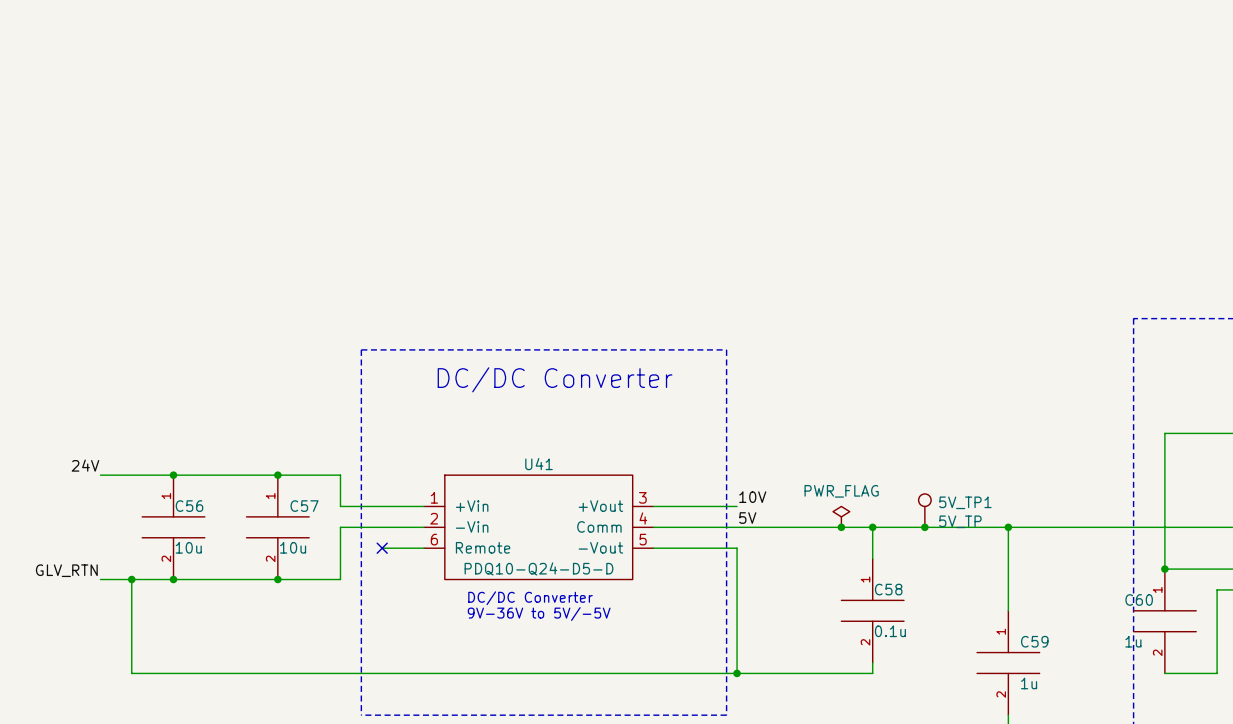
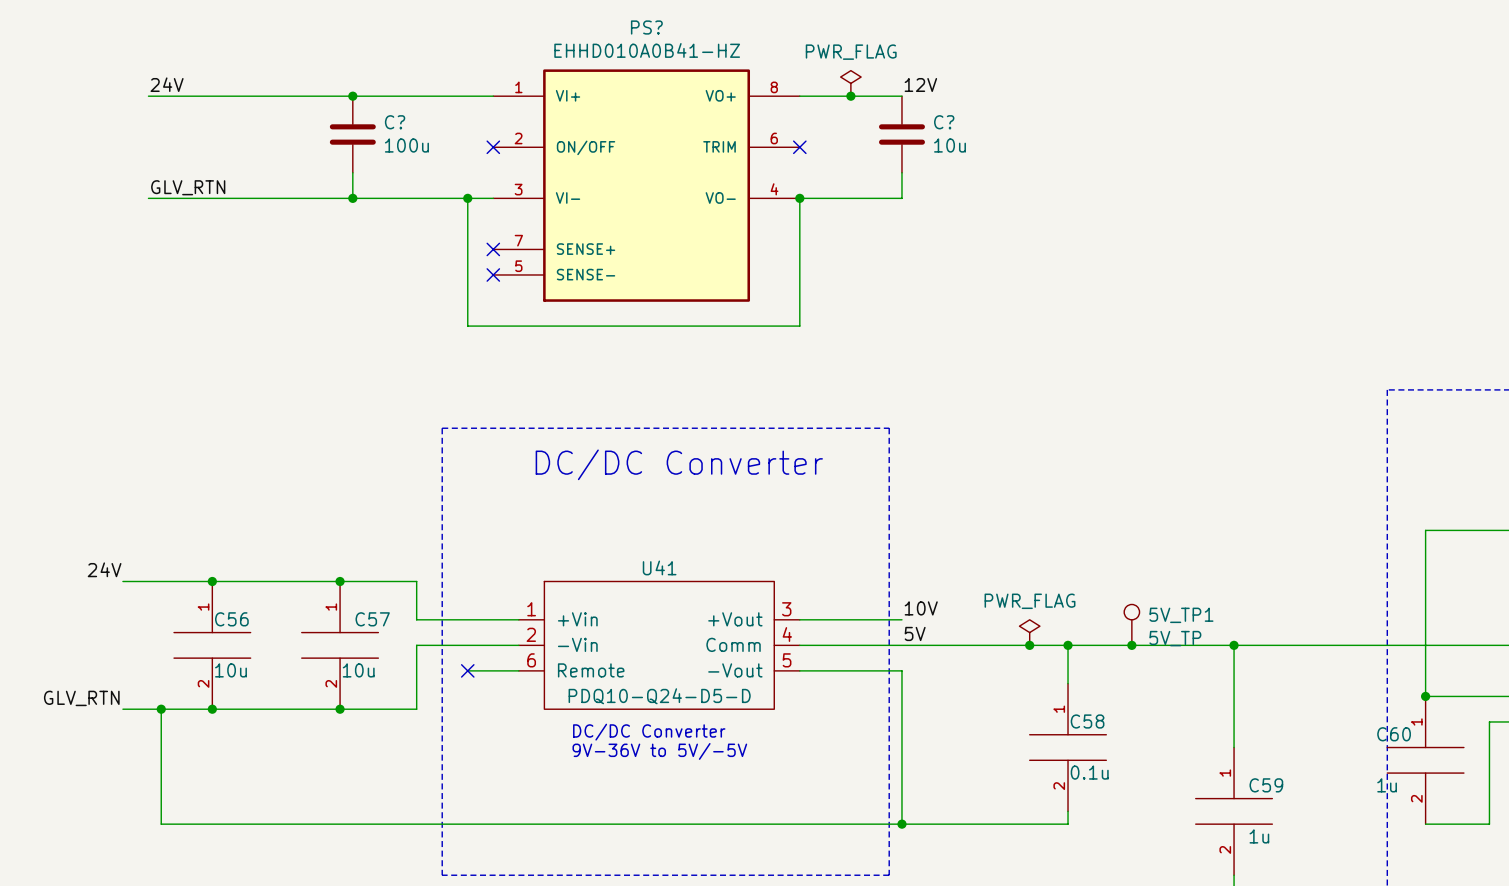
power symbol: none -> PWR_FLAG (850, 83)
label: none -> 24V (167, 84)
label: none -> 12V (920, 84)
wire: none -> (148, 96) (493, 96)
junction: none -> (352, 96)
wire: none -> (799, 96) (901, 96)
junction: none -> (850, 96)
C?: none -> 100u (352, 134)
C?: none -> 10u (901, 134)
no-connect mark: none -> (493, 147)
no-connect mark: none -> (799, 147)
wire: none -> (352, 172) (352, 198)
wire: none -> (901, 172) (901, 198) (799, 198) (799, 326) (467, 326) (467, 198)
PS?: none -> EHHD010A0B41-HZ (646, 185)
label: none -> GLV_RTN (188, 187)
wire: none -> (148, 198) (493, 198)
junction: none -> (352, 198)
junction: none -> (467, 198)
junction: none -> (799, 198)
no-connect mark: none -> (493, 249)
no-connect mark: none -> (493, 274)

